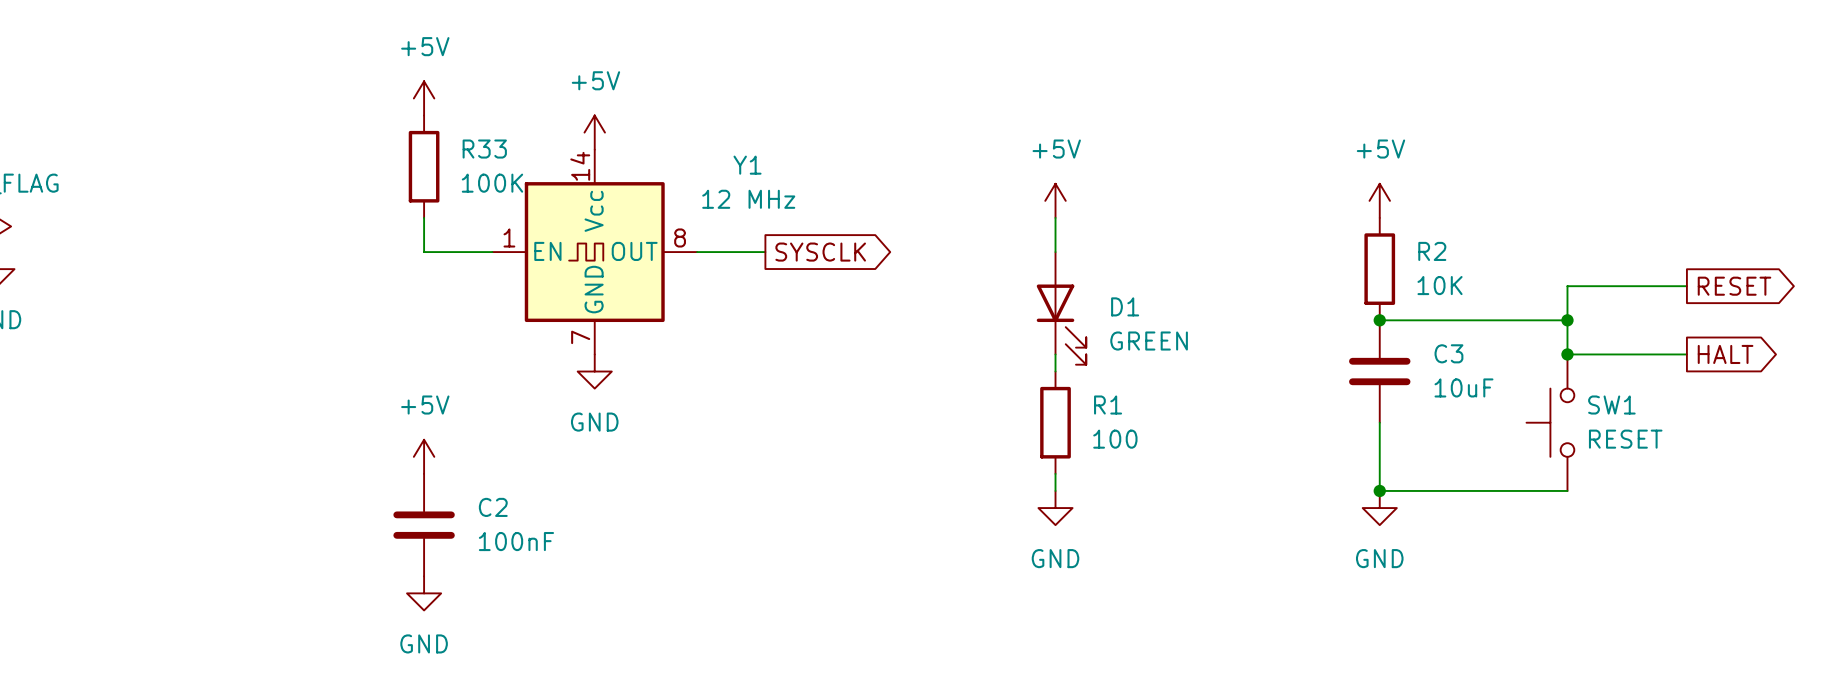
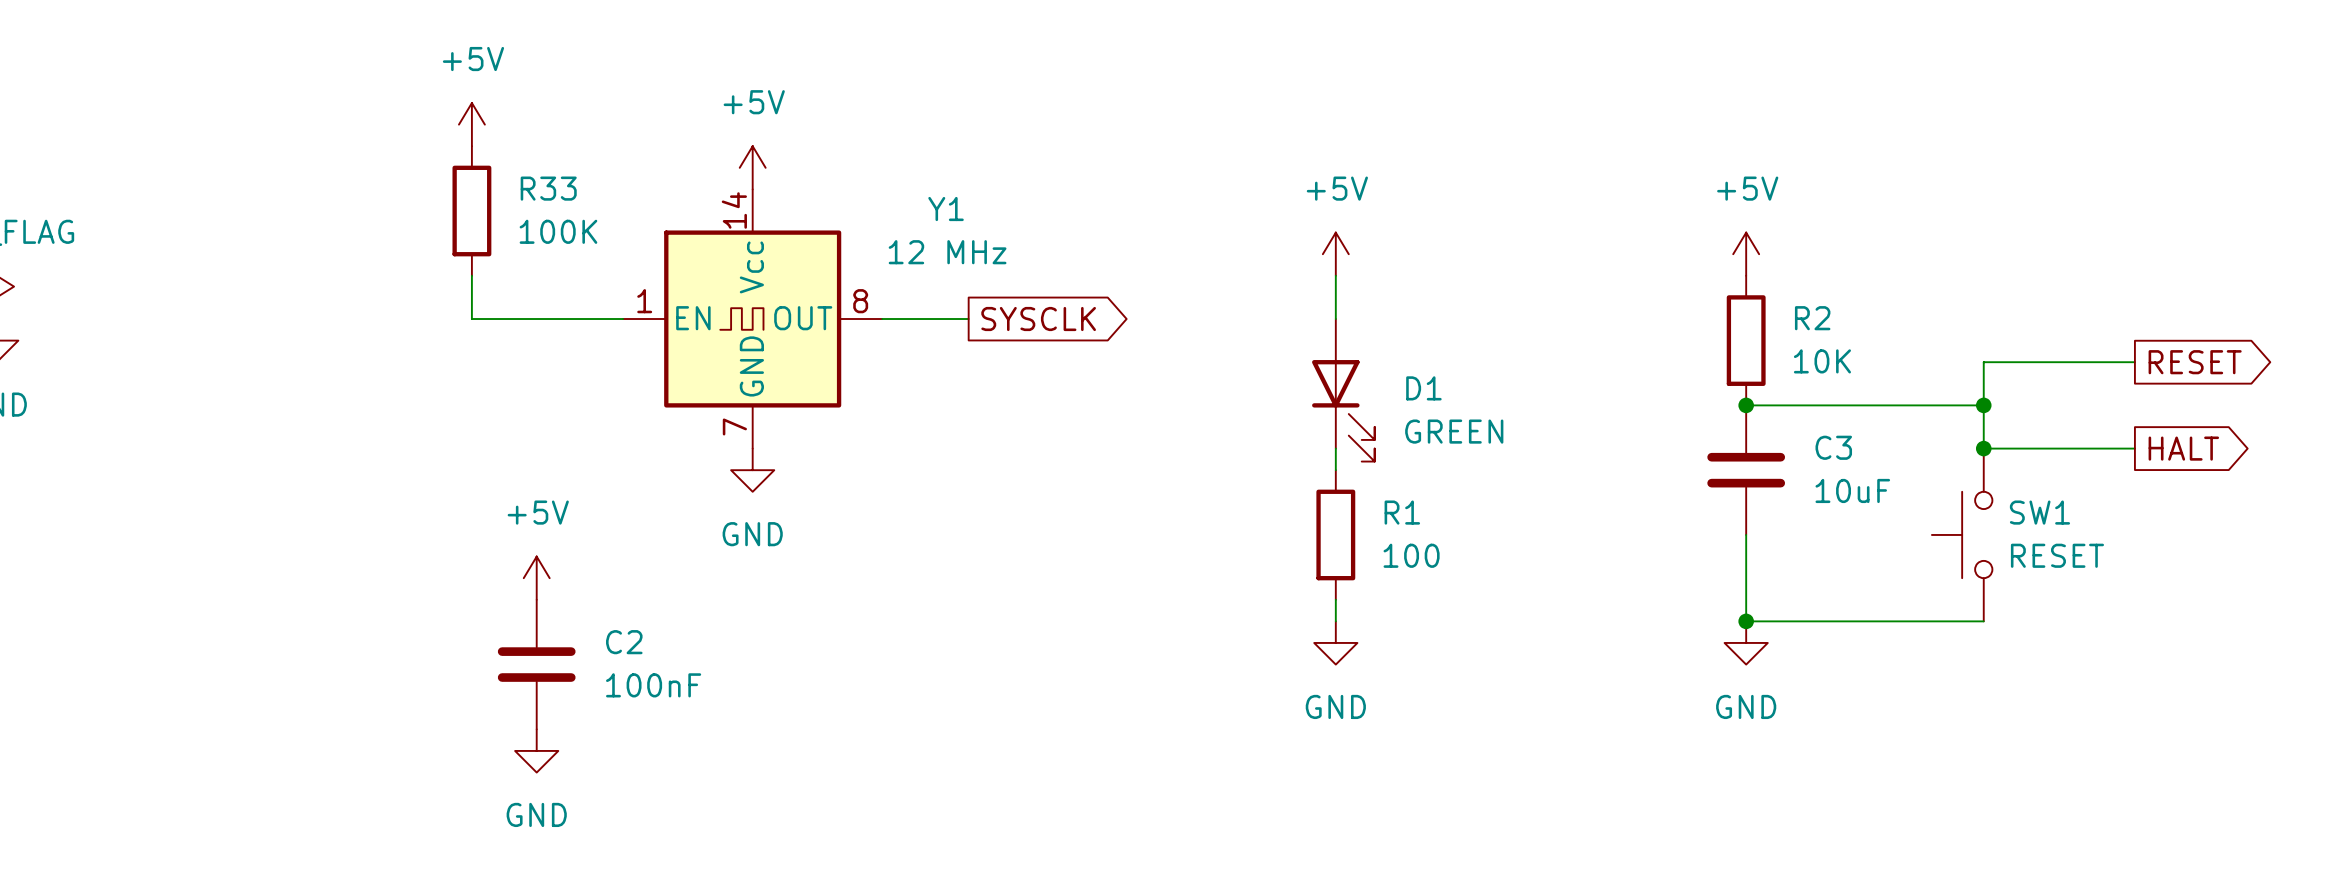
power symbol position: +5V (424, 98) -> +5V (471, 124)
R33 position: (424, 166) -> (471, 211)
wire: (424, 217) (424, 252) -> (471, 275) (471, 319) (536, 319)

